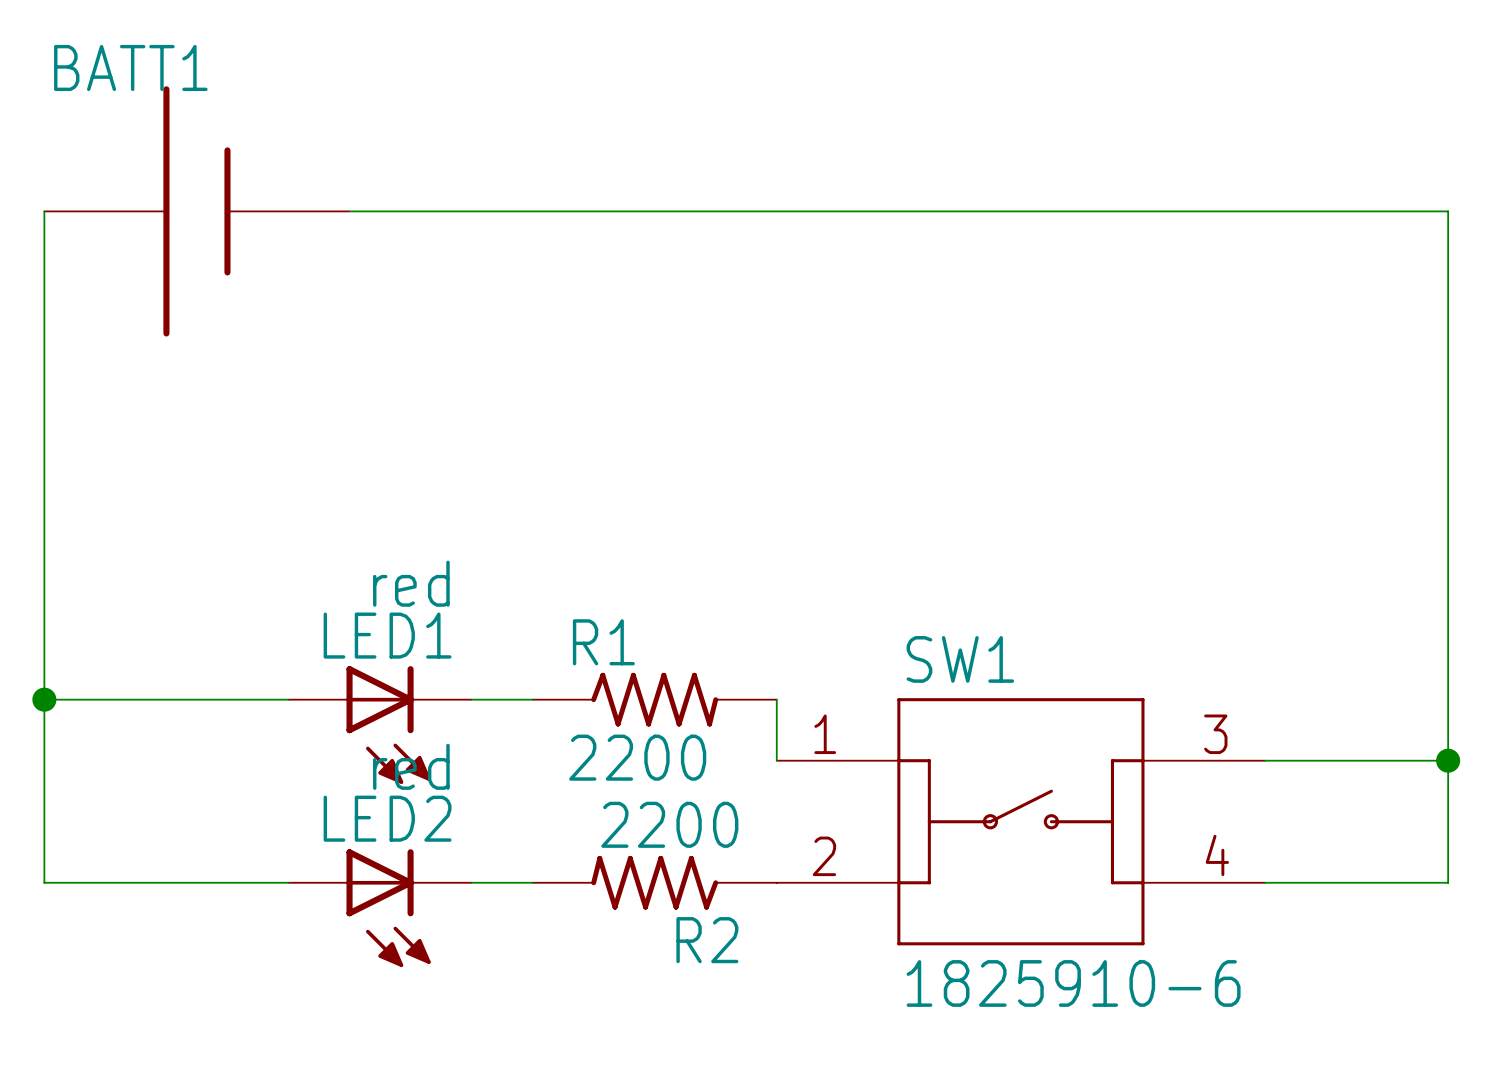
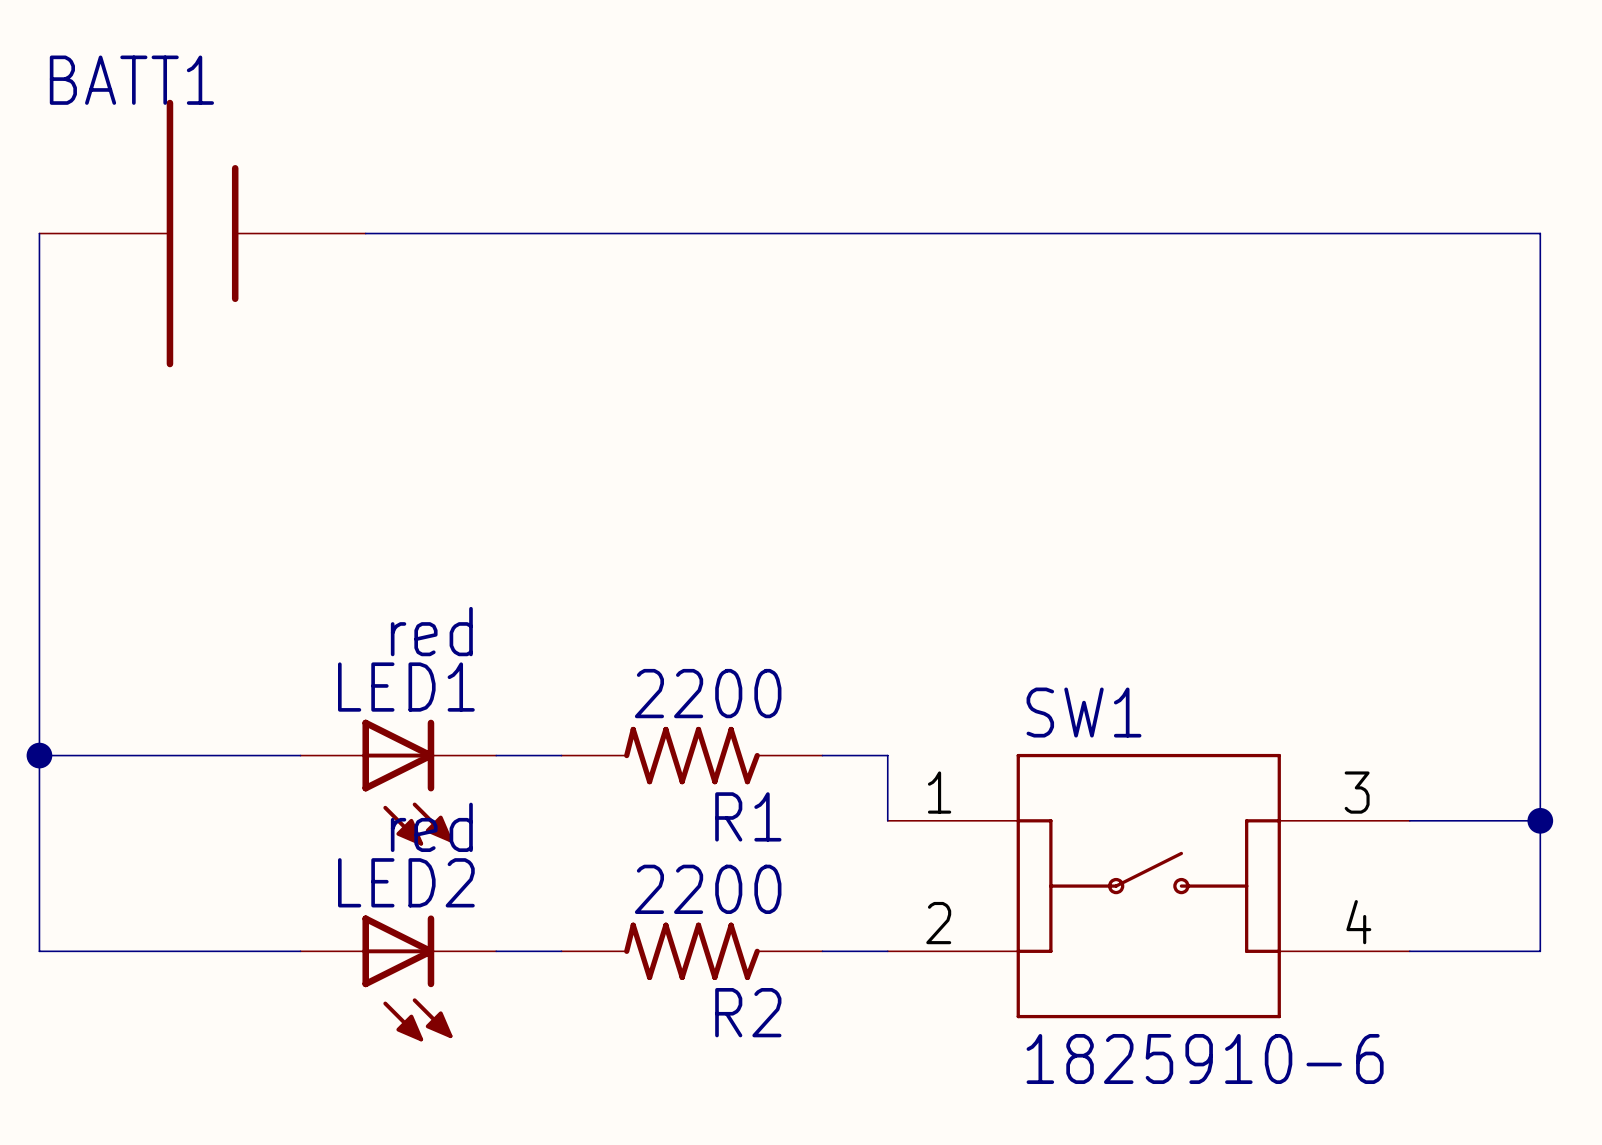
R1 rotation: 0° (654, 699) -> 180° (691, 755)
wire: (776, 699) (776, 760) -> (822, 755) (887, 755) (887, 820)
SW1 position: (1020, 821) -> (1148, 886)

